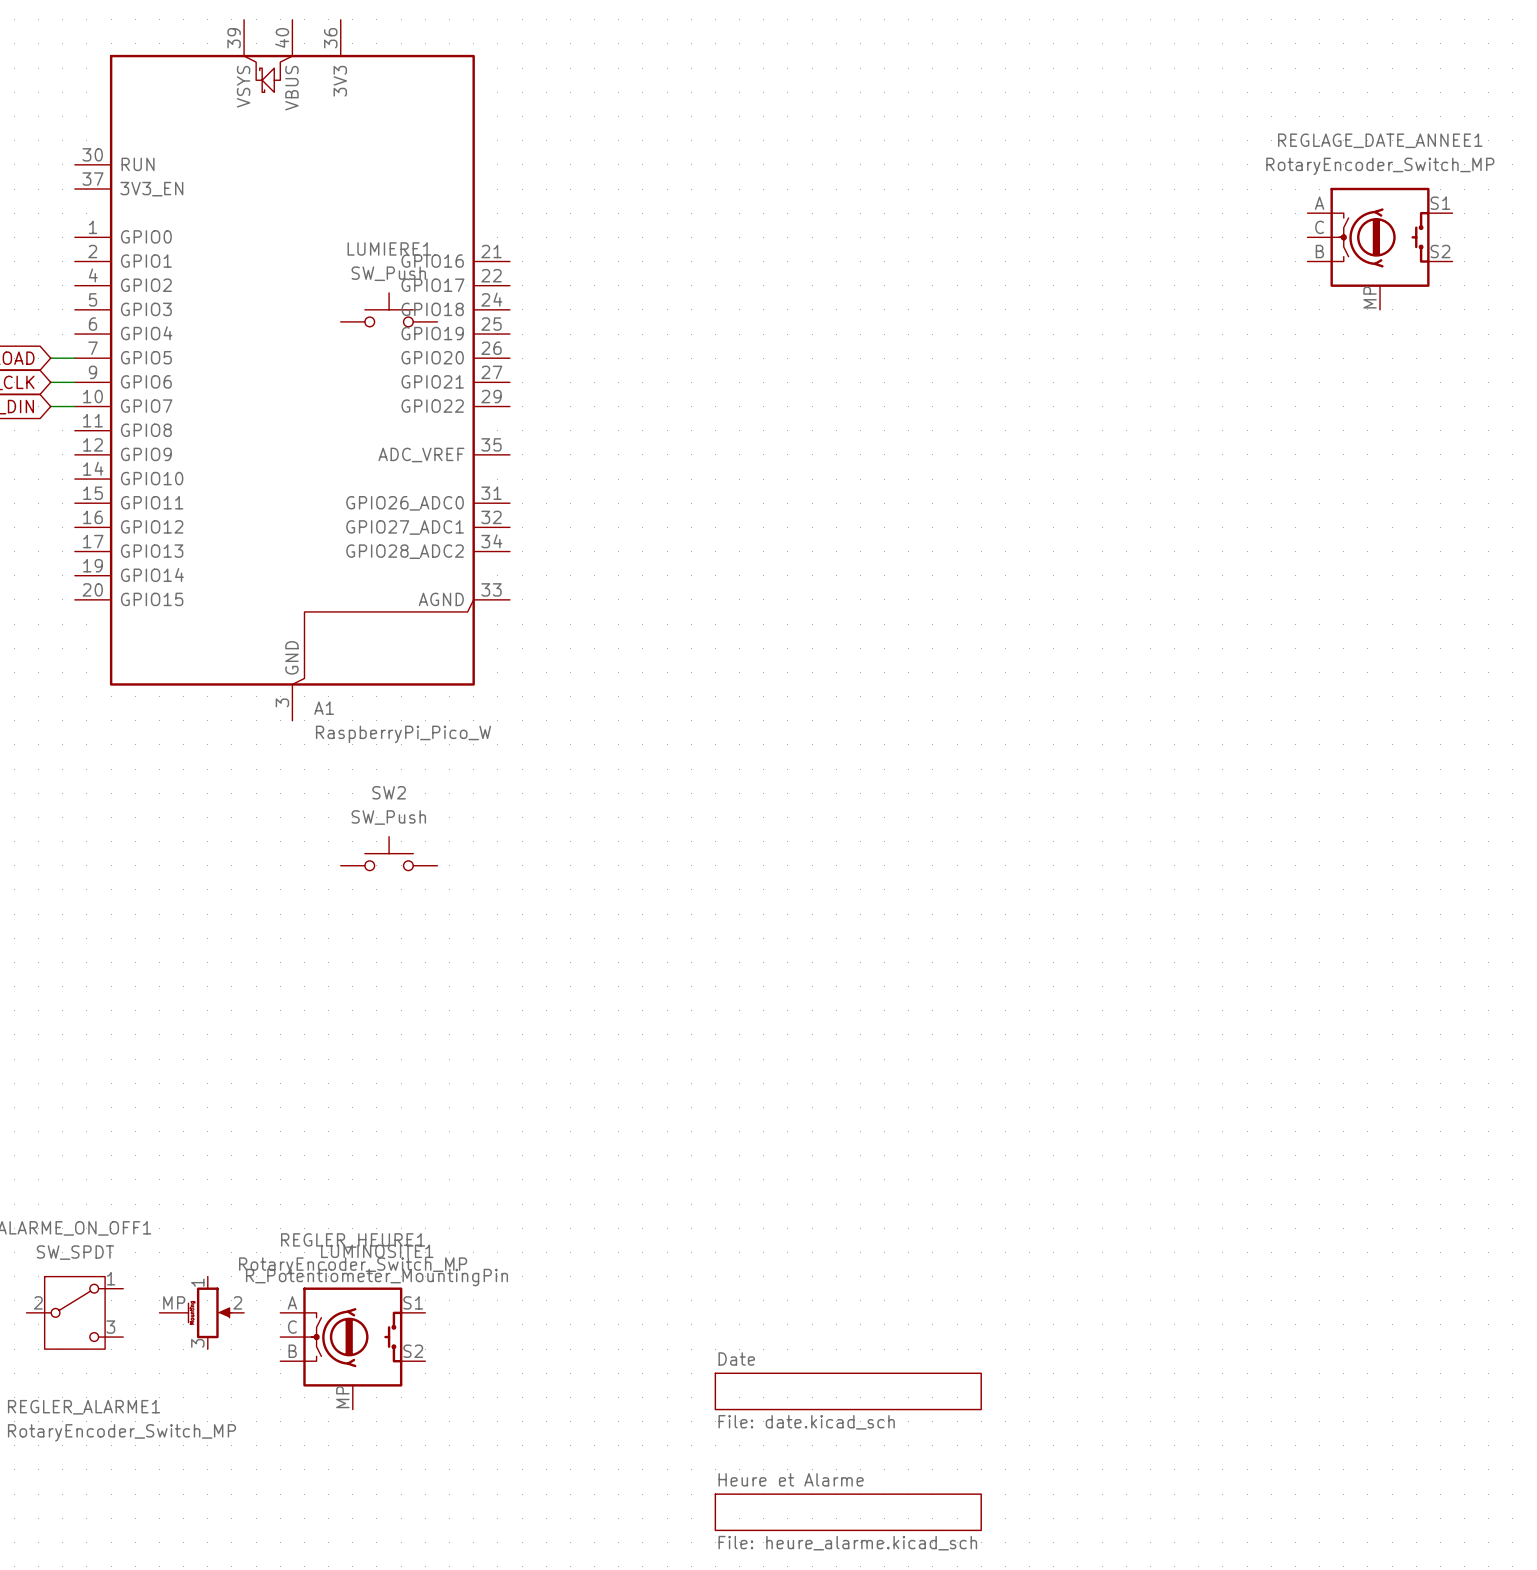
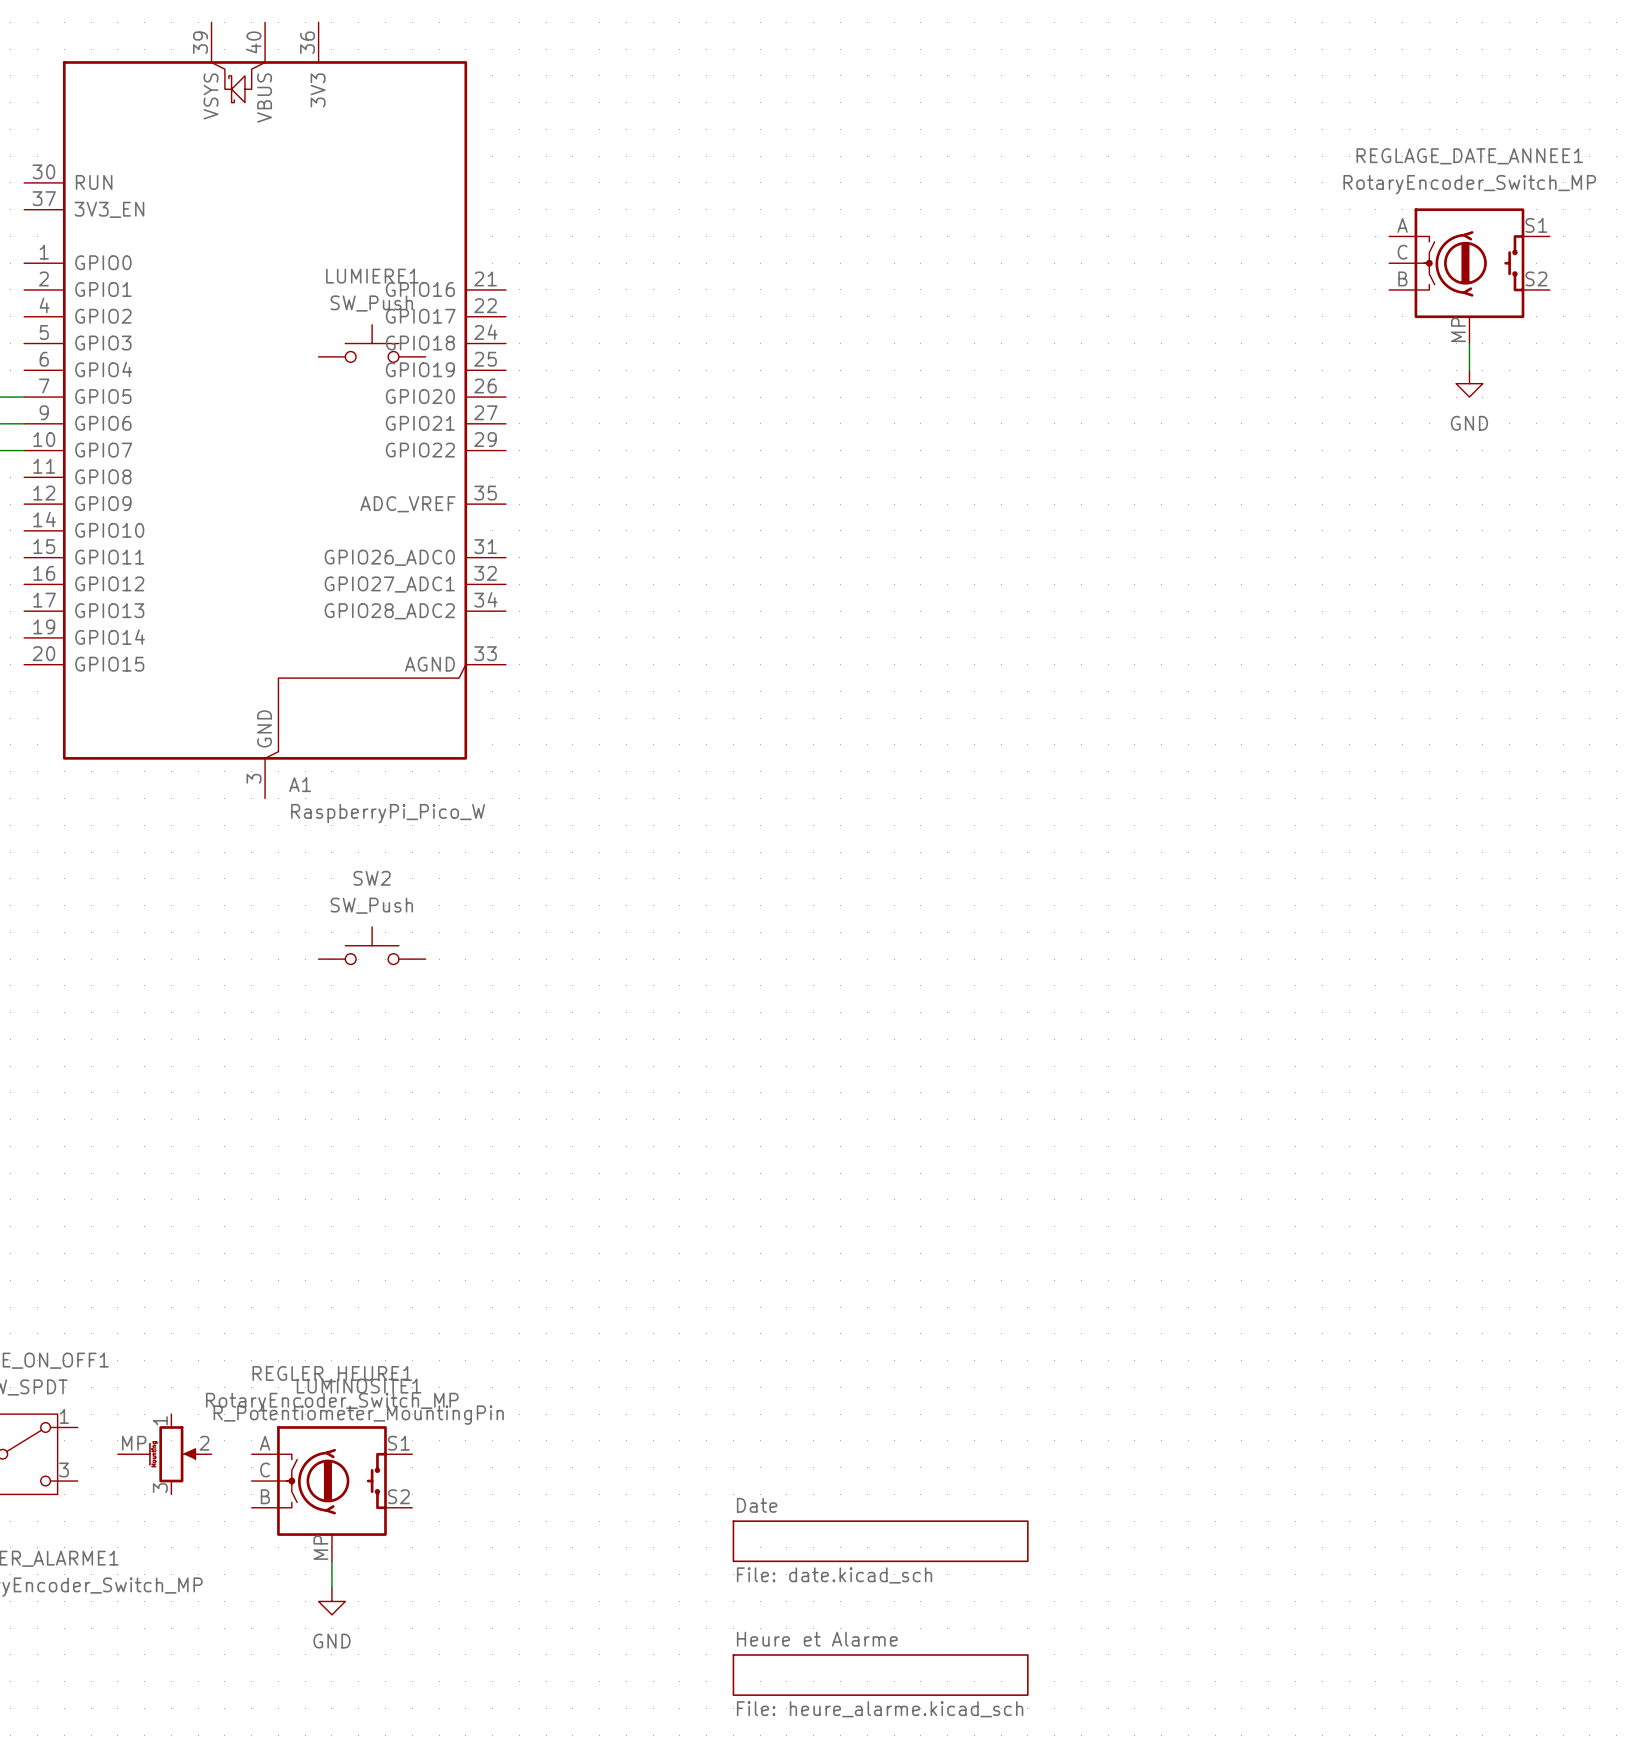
wire: none -> (1469, 343) (1469, 370)
power symbol: none -> GND (1469, 383)
wire: none -> (331, 1561) (331, 1588)
power symbol: none -> GND (331, 1601)

